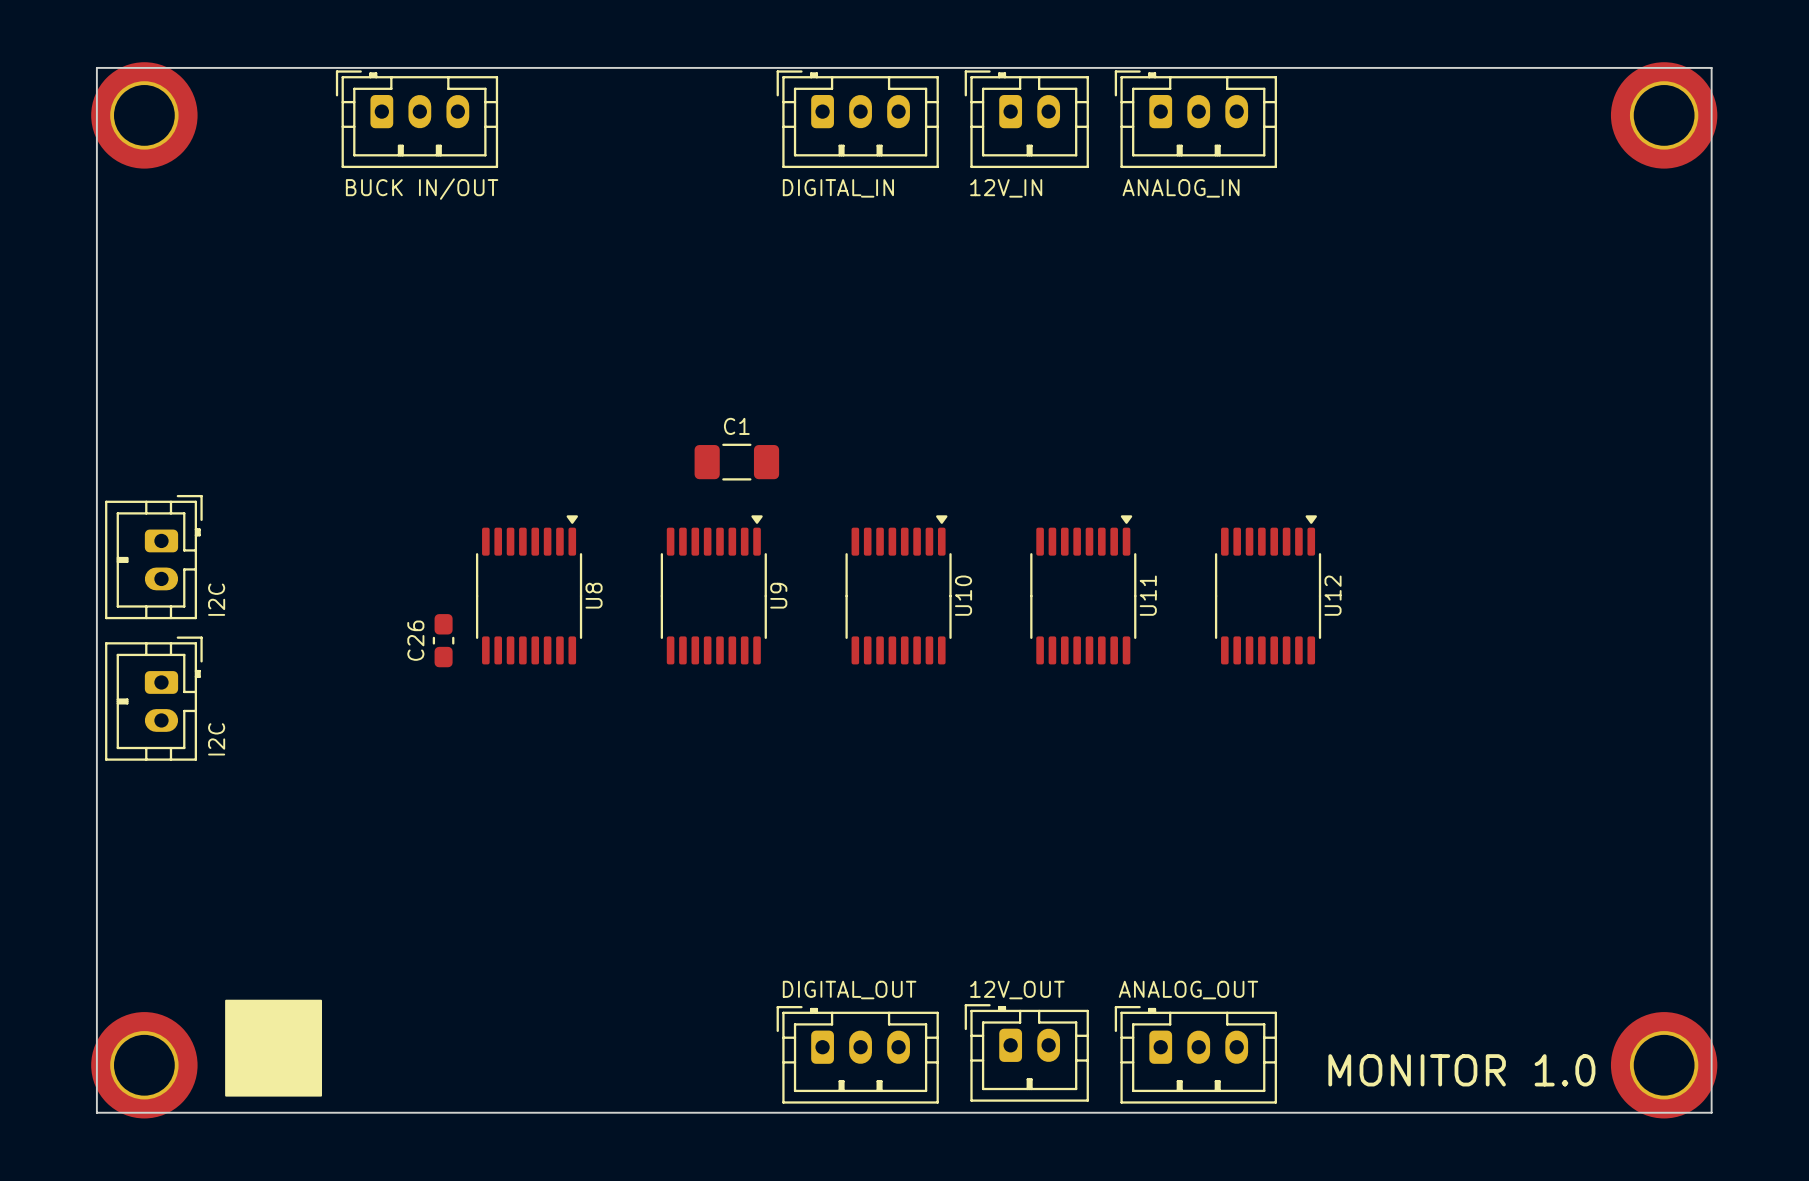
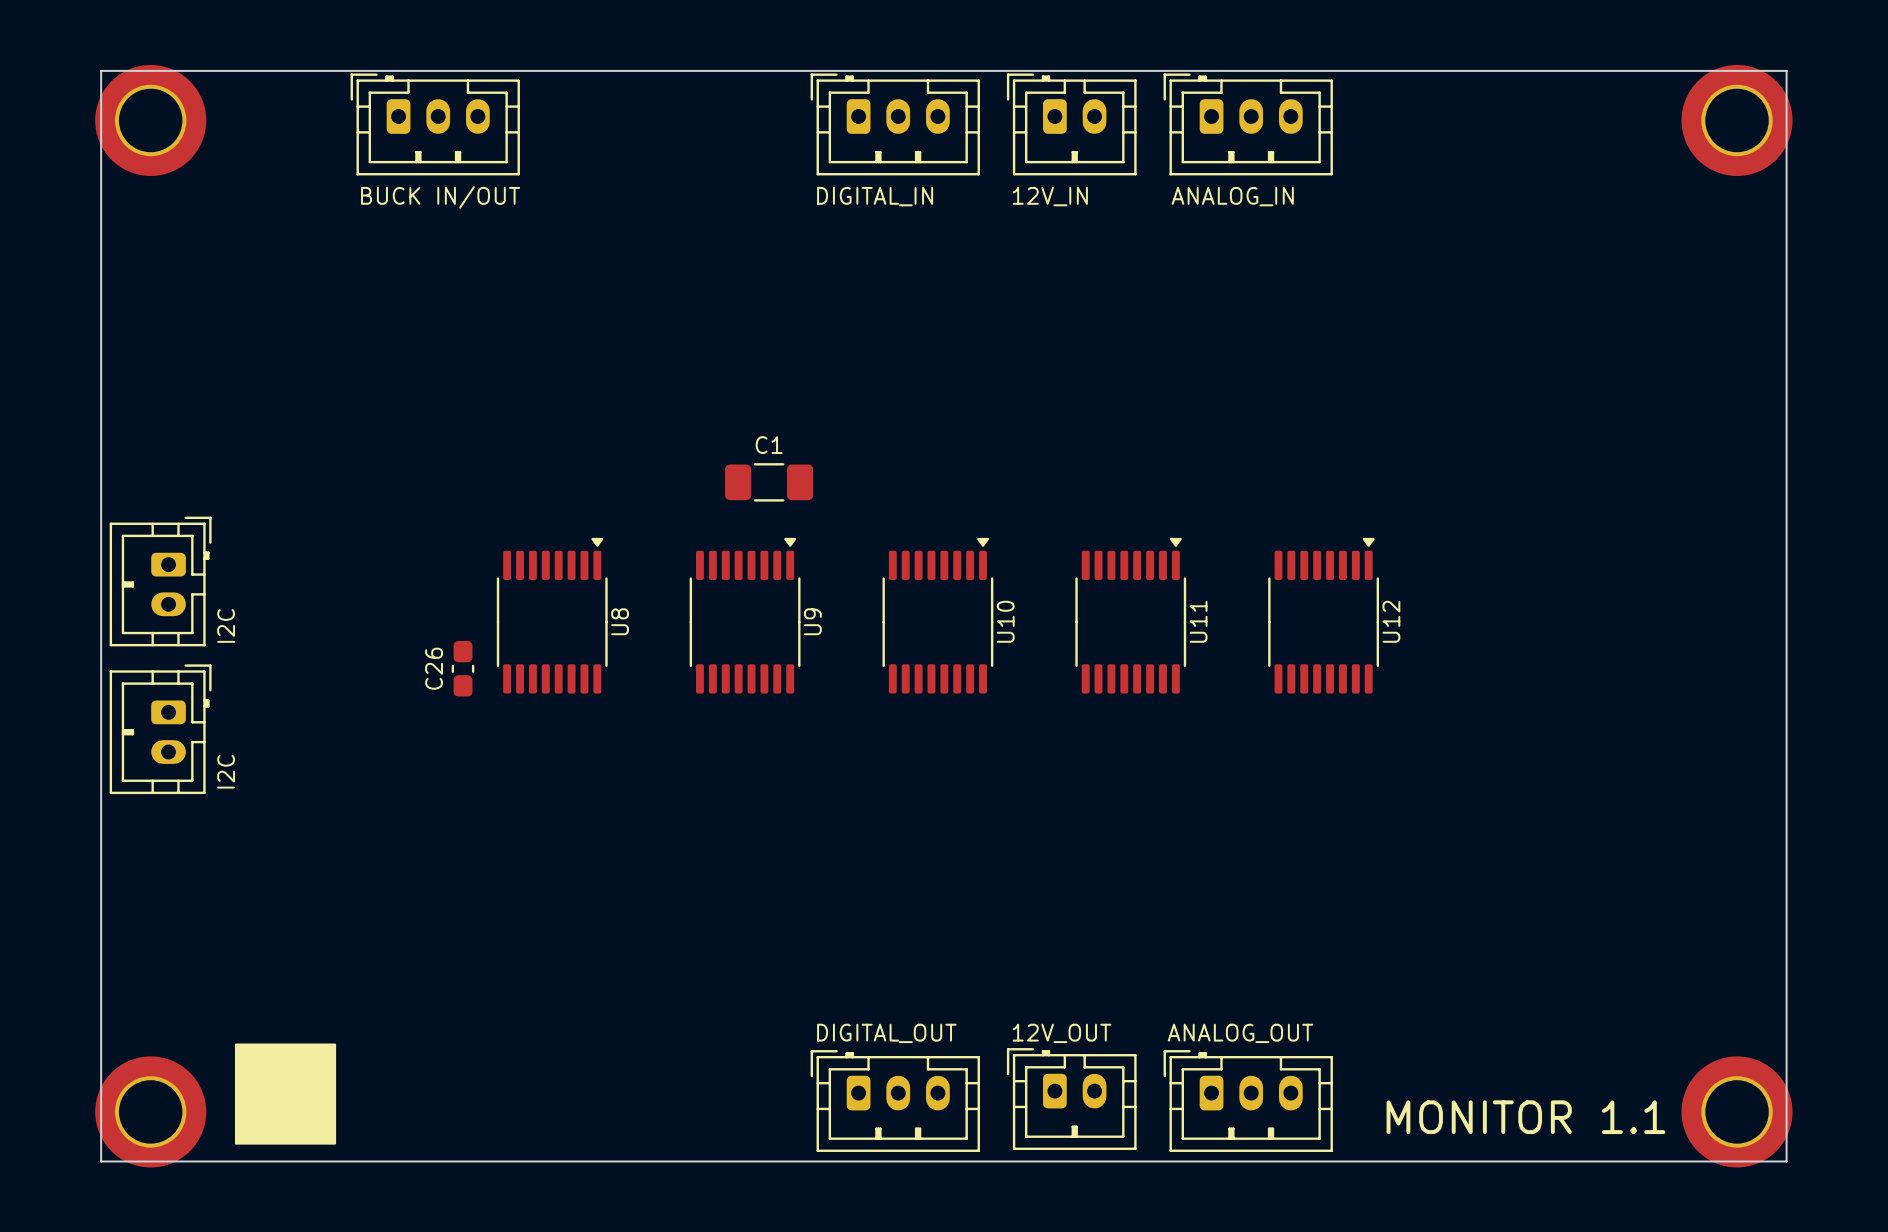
text: MONITOR 1.0 (1461, 1070) -> MONITOR 1.1 (1525, 1117)

